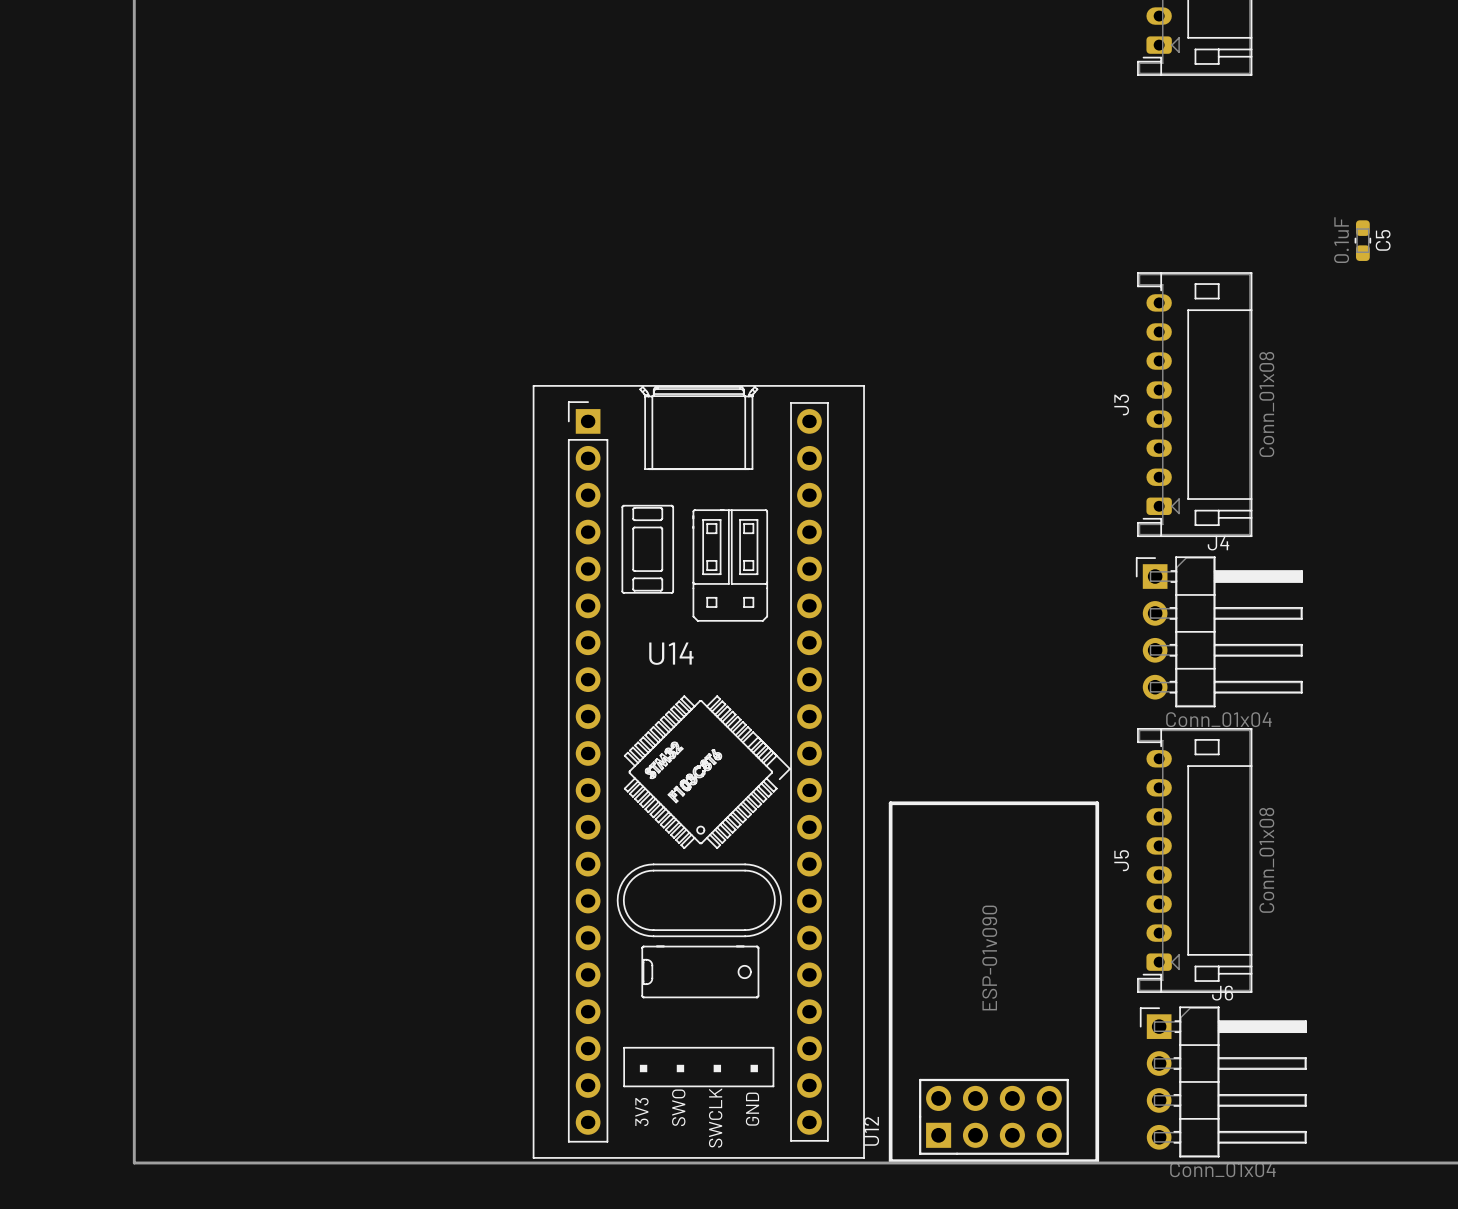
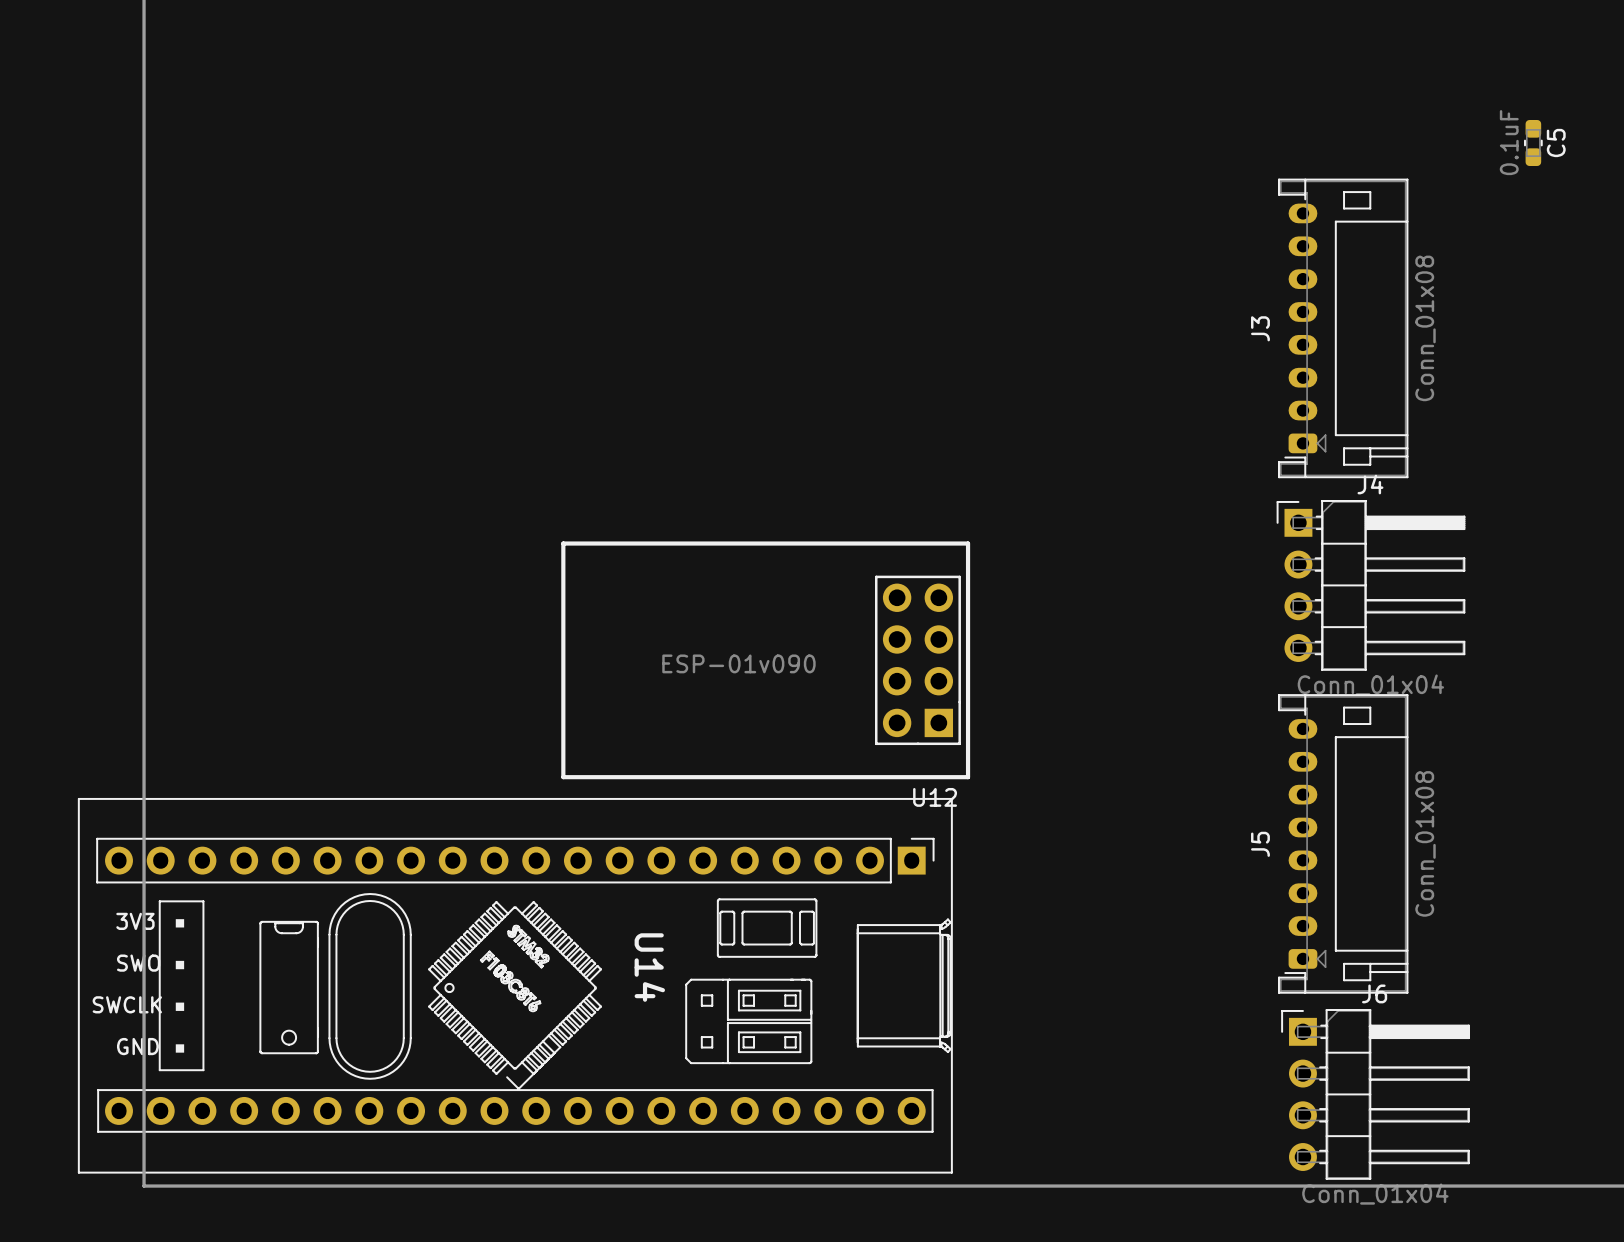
U14 rotation: 0° (698, 771) -> 90° clockwise (515, 985)
U12 rotation: 0° (993, 982) -> 90° counterclockwise (765, 660)
U12 position: (993, 982) -> (765, 660)

